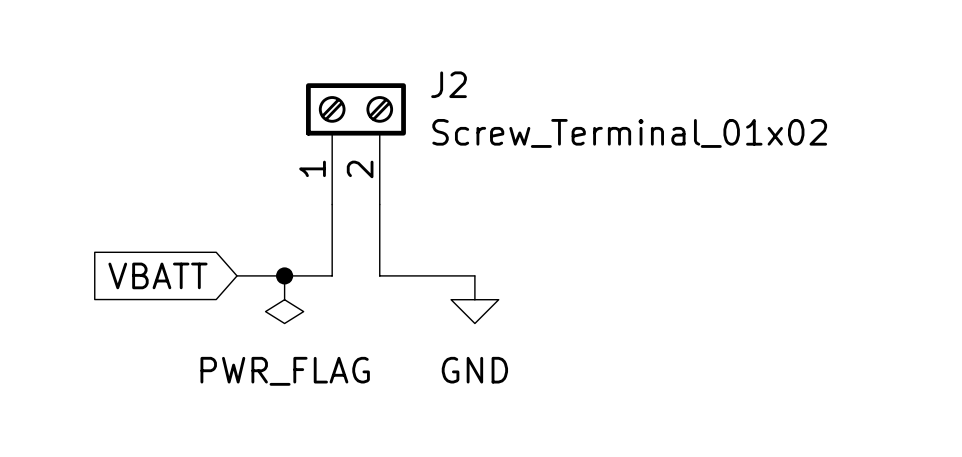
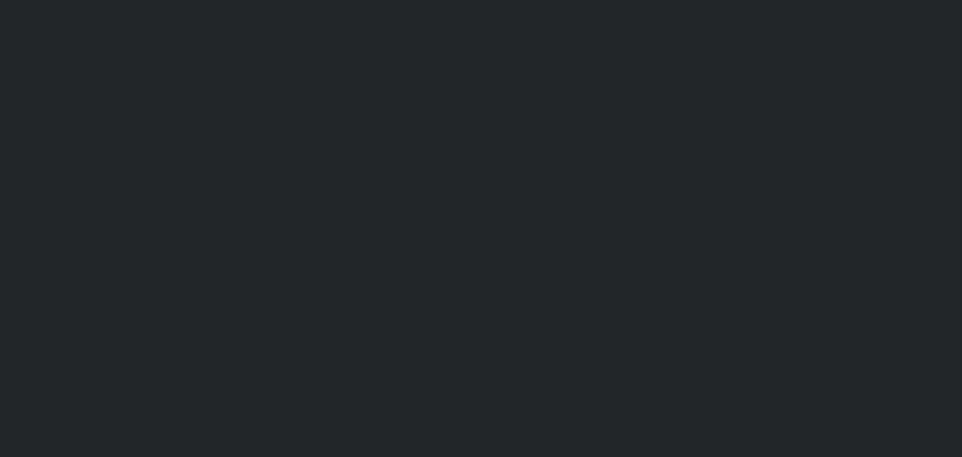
J2: Screw_Terminal_01x02 (355, 143) -> none
wire: (332, 204) (332, 275) (237, 275) -> none
wire: (379, 204) (379, 275) (474, 275) -> none
global label: VBATT (157, 275) -> none
junction: (284, 275) -> none
power symbol: PWR_FLAG (284, 299) -> none
power symbol: GND (474, 299) -> none

